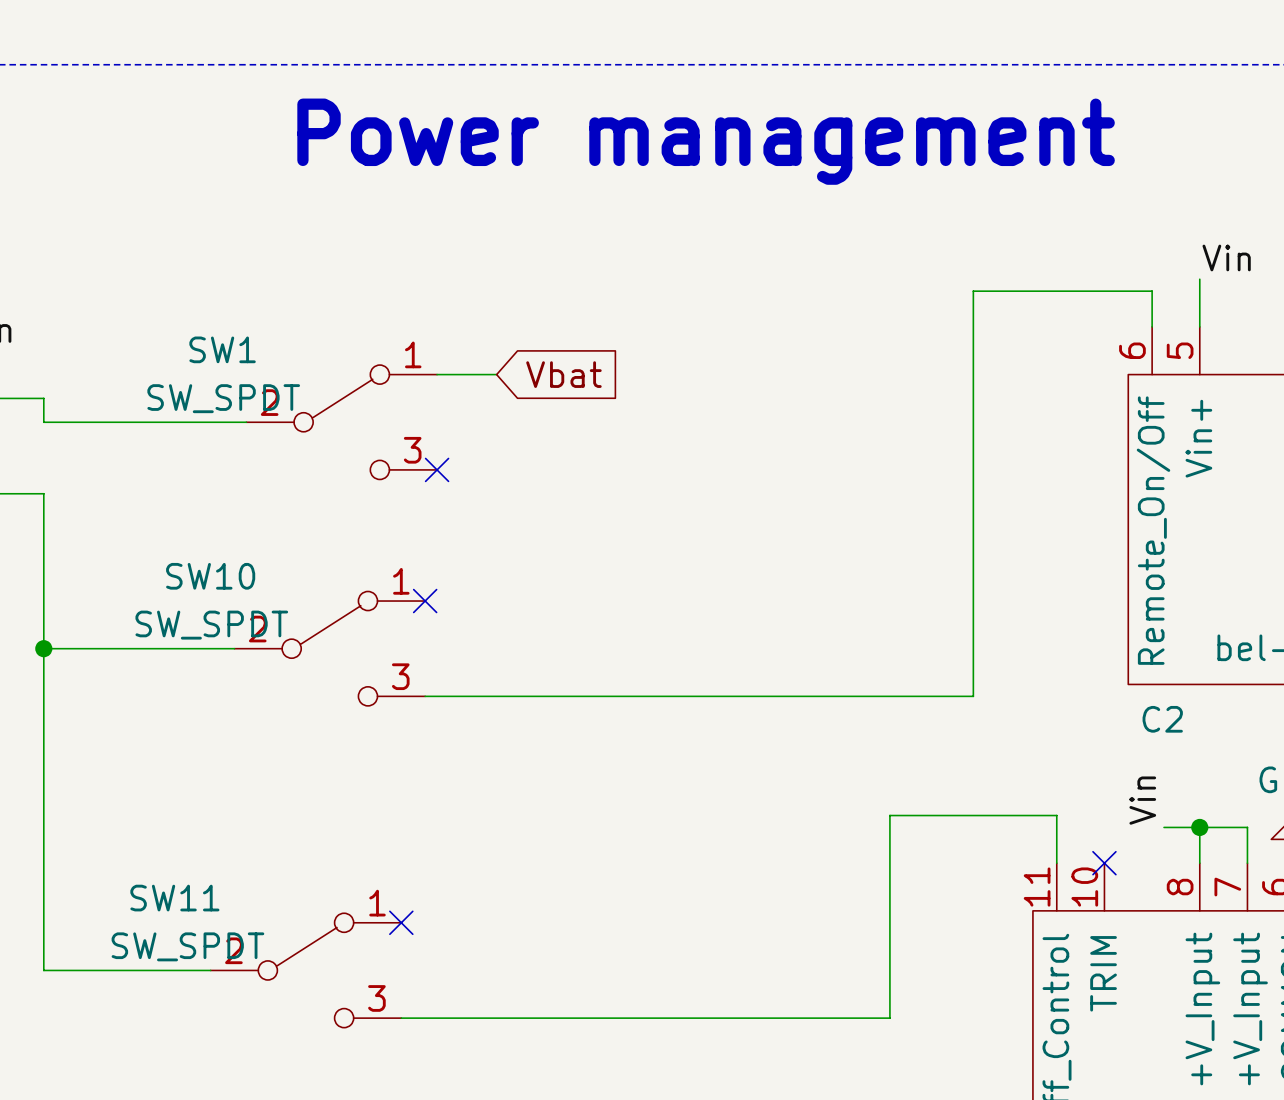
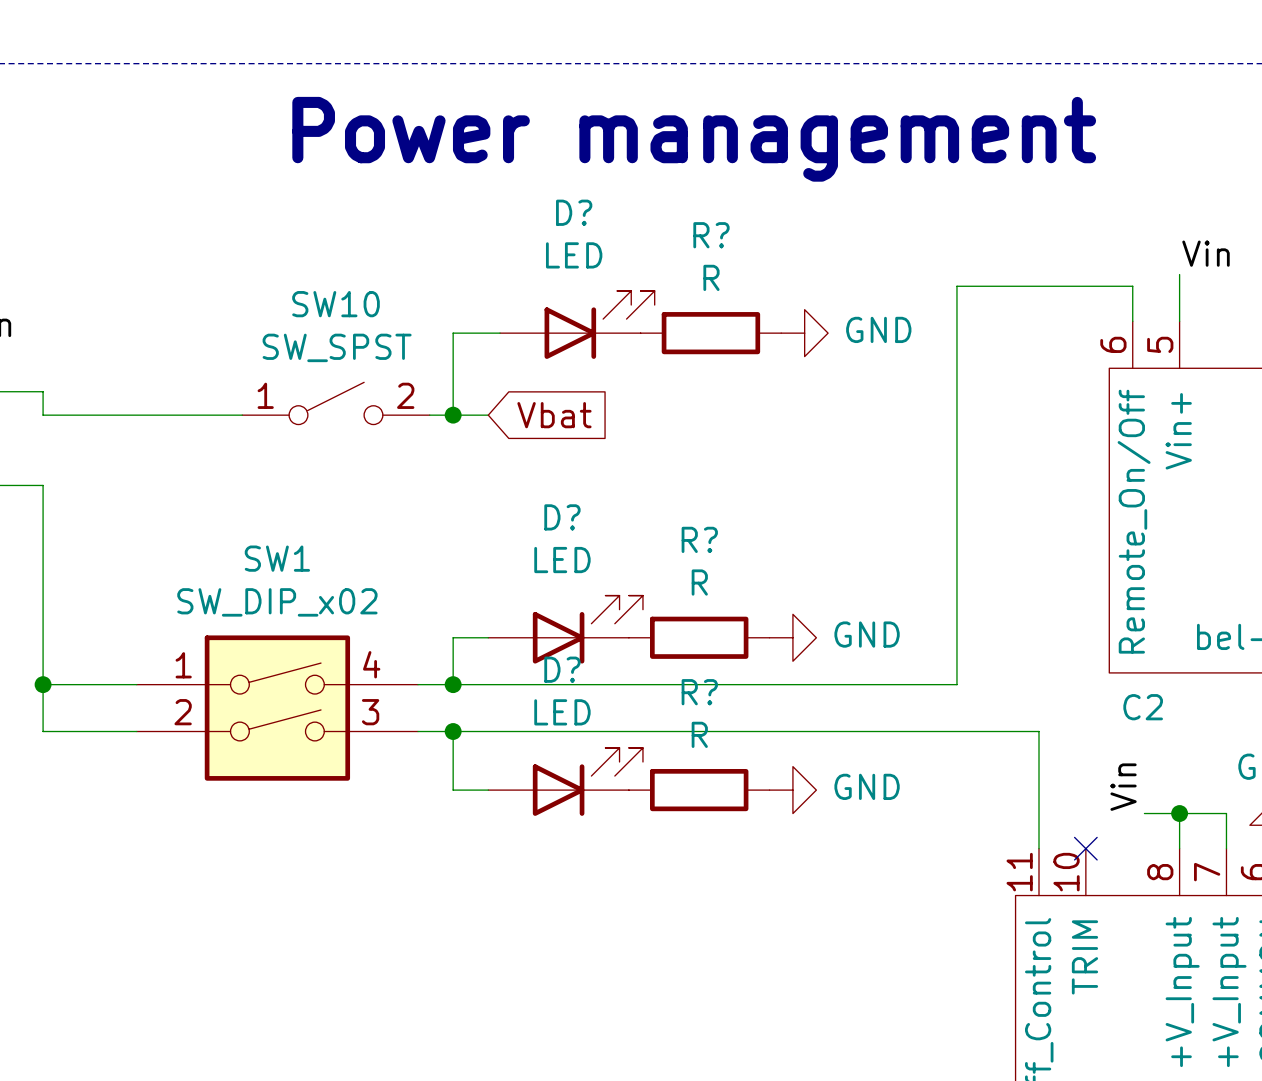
D?: none -> LED (577, 324)
wire: none -> (500, 333) (453, 333) (453, 415)
R?: none -> R (710, 333)
power symbol: none -> GND (804, 333)
SW1 name position: SW1 (222, 349) -> SW1 (277, 558)
SW1 symbol: [246, 365, 438, 480] -> [136, 635, 419, 781]
wire: (437, 374) (496, 374) -> (429, 415) (488, 415)
global label position: Vbat (563, 374) -> Vbat (554, 415)
SW1 value: SW_SPDT (223, 398) -> SW_DIP_x02 (277, 602)
junction: none -> (453, 415)
no-connect mark: (437, 469) -> none
SW10 name position: SW10 (210, 576) -> SW10 (335, 304)
SW10 symbol: [234, 591, 426, 706] -> [242, 382, 430, 425]
no-connect mark: (425, 601) -> none
SW10 value: SW_SPDT (211, 625) -> SW_SPST (337, 347)
D?: none -> LED (565, 629)
wire: (43, 648) (234, 648) -> none
junction position: (43, 648) -> (43, 684)
wire: none -> (488, 637) (453, 637) (453, 684)
R?: none -> R (699, 637)
power symbol: none -> GND (792, 637)
wire: none -> (43, 684) (136, 684)
junction: none -> (453, 684)
wire: (43, 744) (43, 970) (210, 970) -> (43, 731) (136, 731)
wire: none -> (453, 731) (453, 790) (488, 790)
junction: none -> (453, 731)
D?: none -> LED (565, 781)
R?: none -> R (699, 790)
power symbol: none -> GND (792, 790)
wire: (1056, 815) (889, 815) (889, 1018) (401, 1018) -> (1039, 801) (1039, 731) (418, 731)
no-connect mark: (401, 922) -> none
SW11: SW_SPDT (305, 970) -> none

